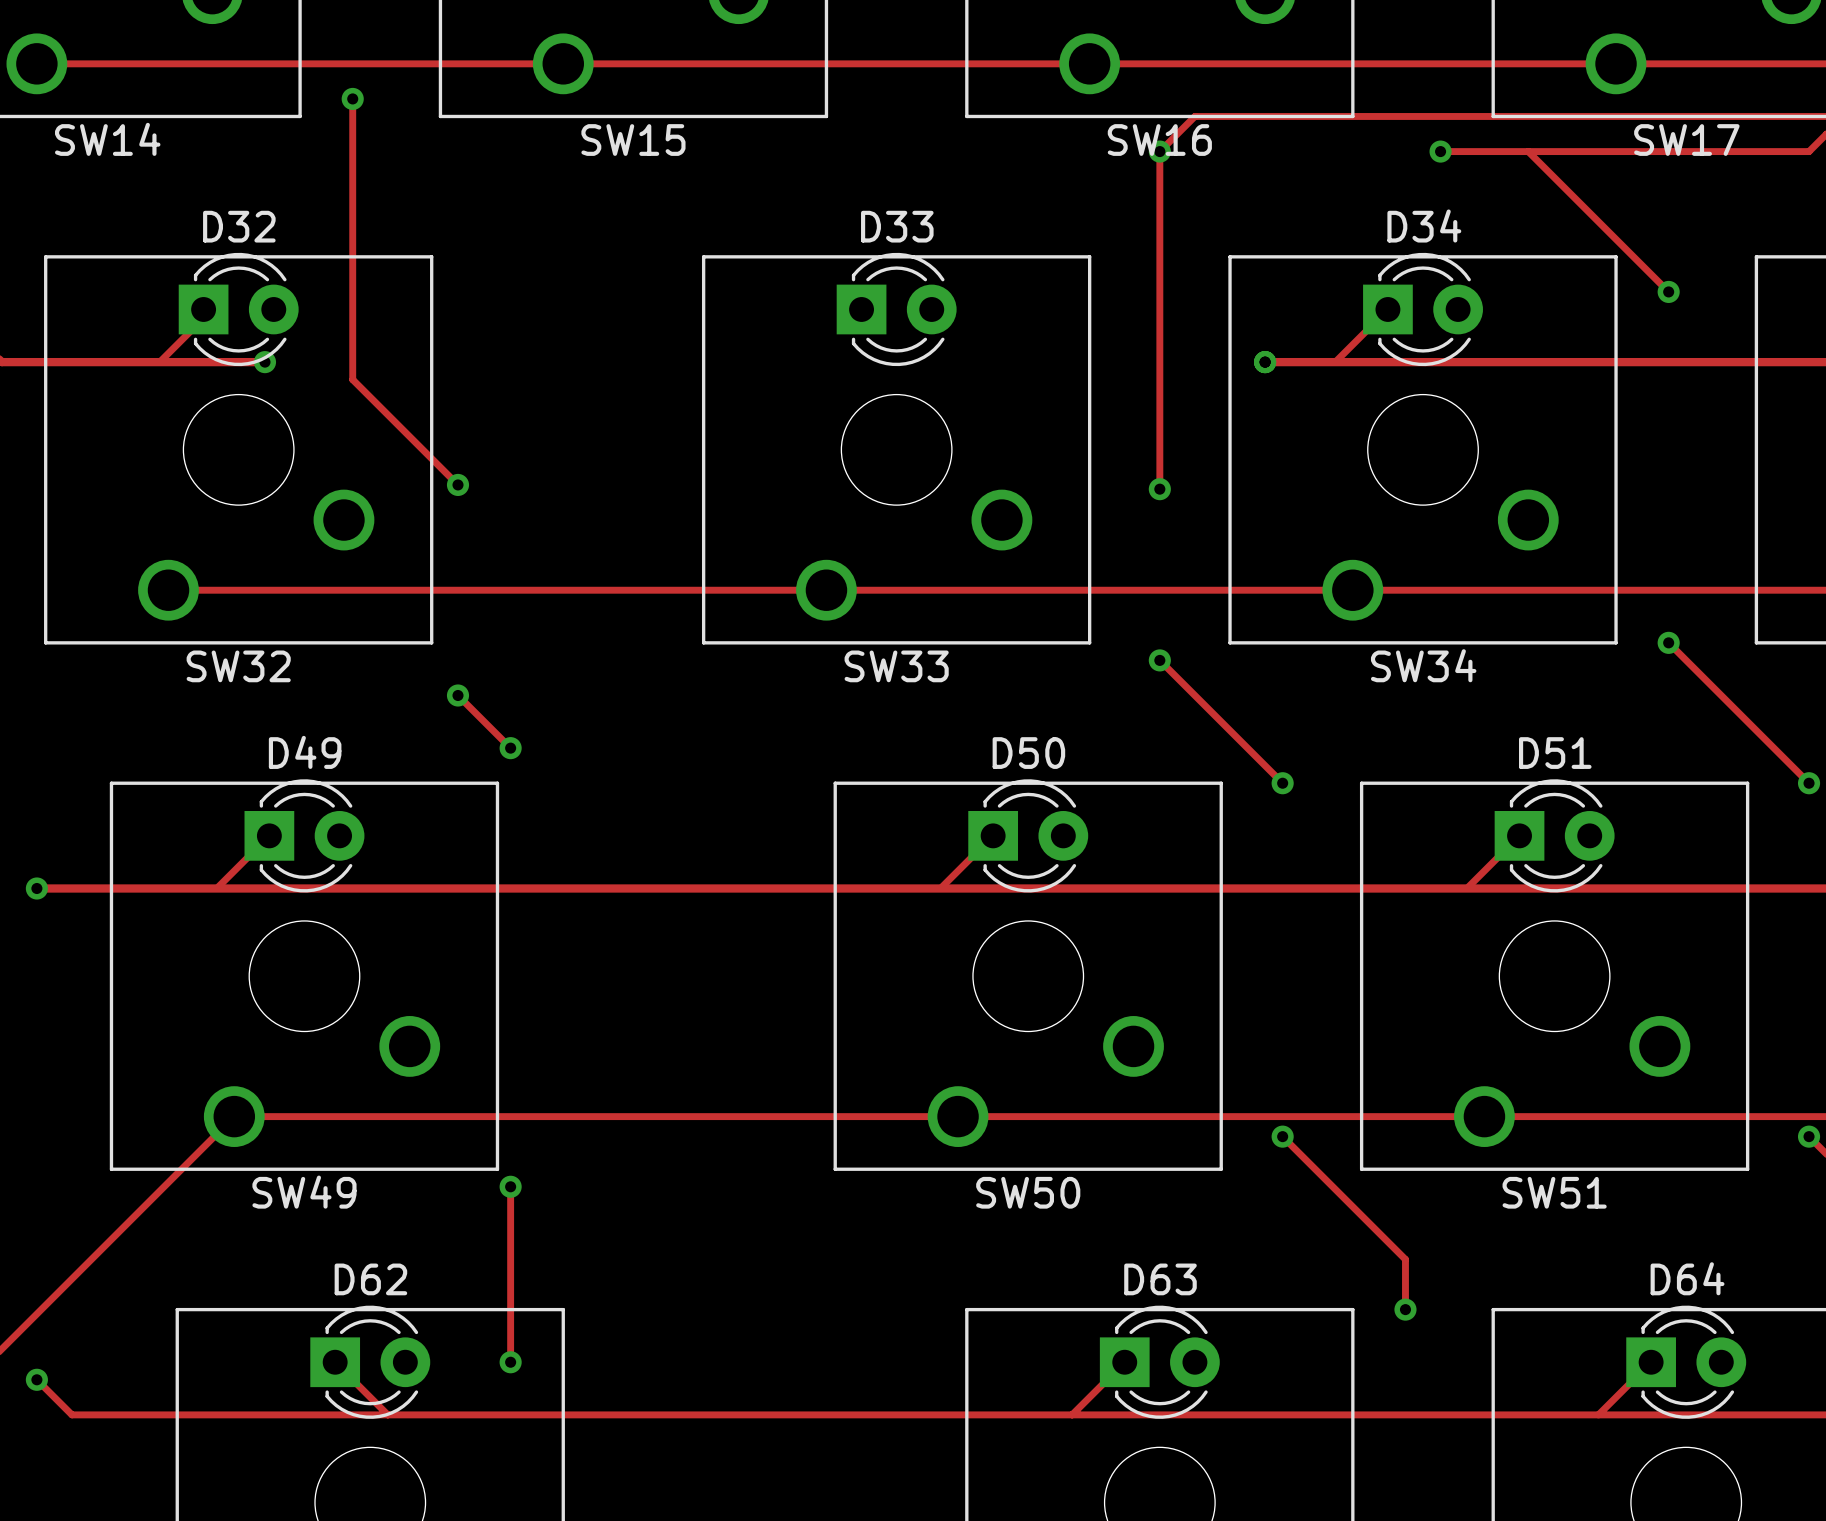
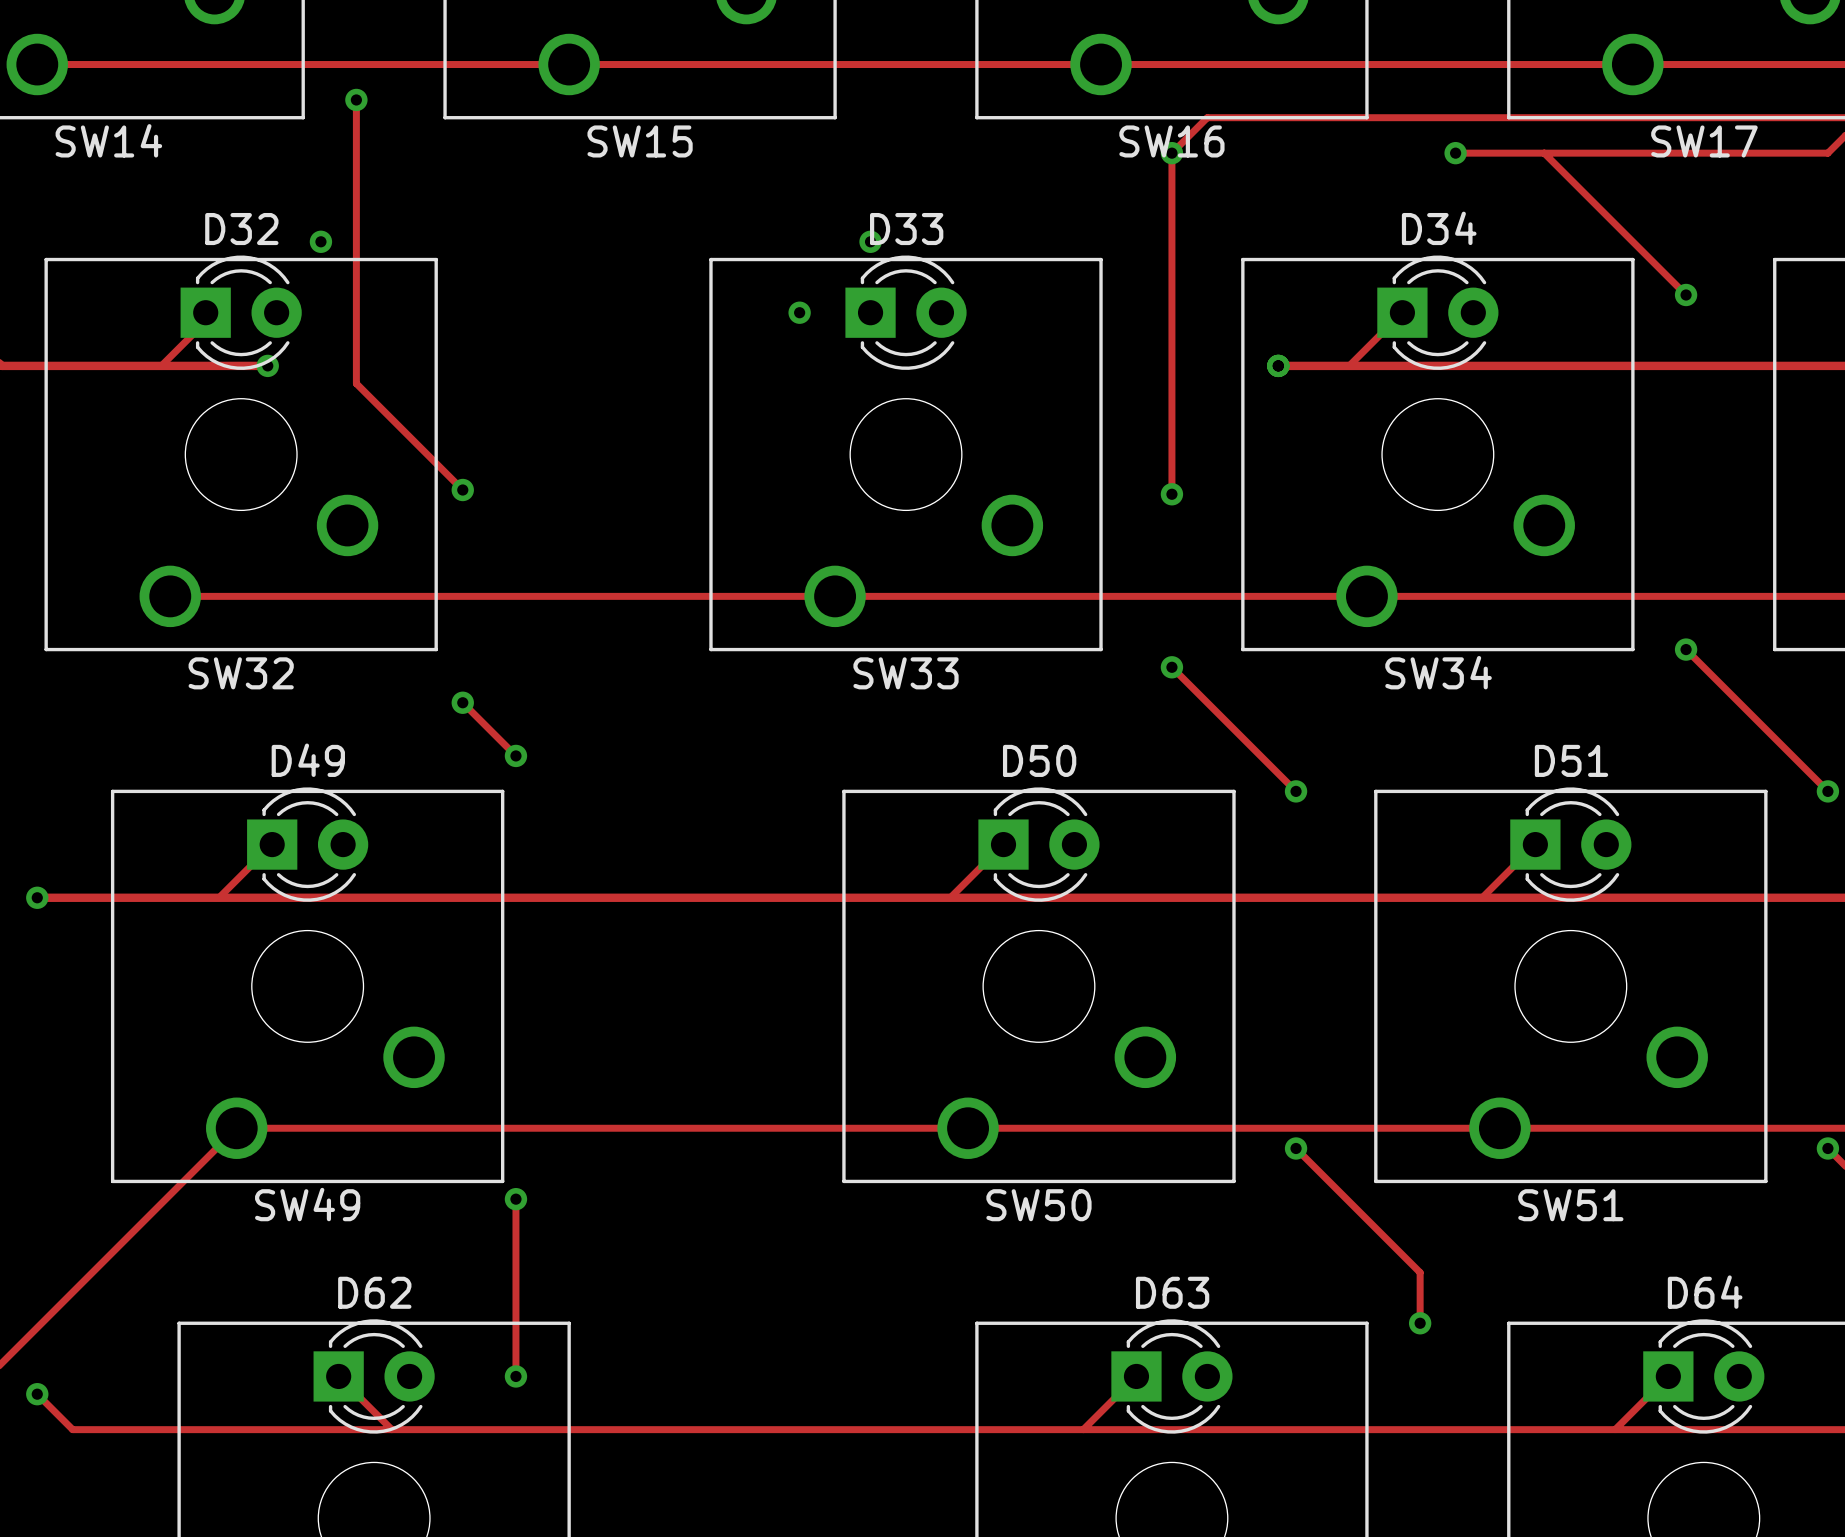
via: none -> (320, 241)
via: none -> (870, 241)
via: none -> (799, 312)

